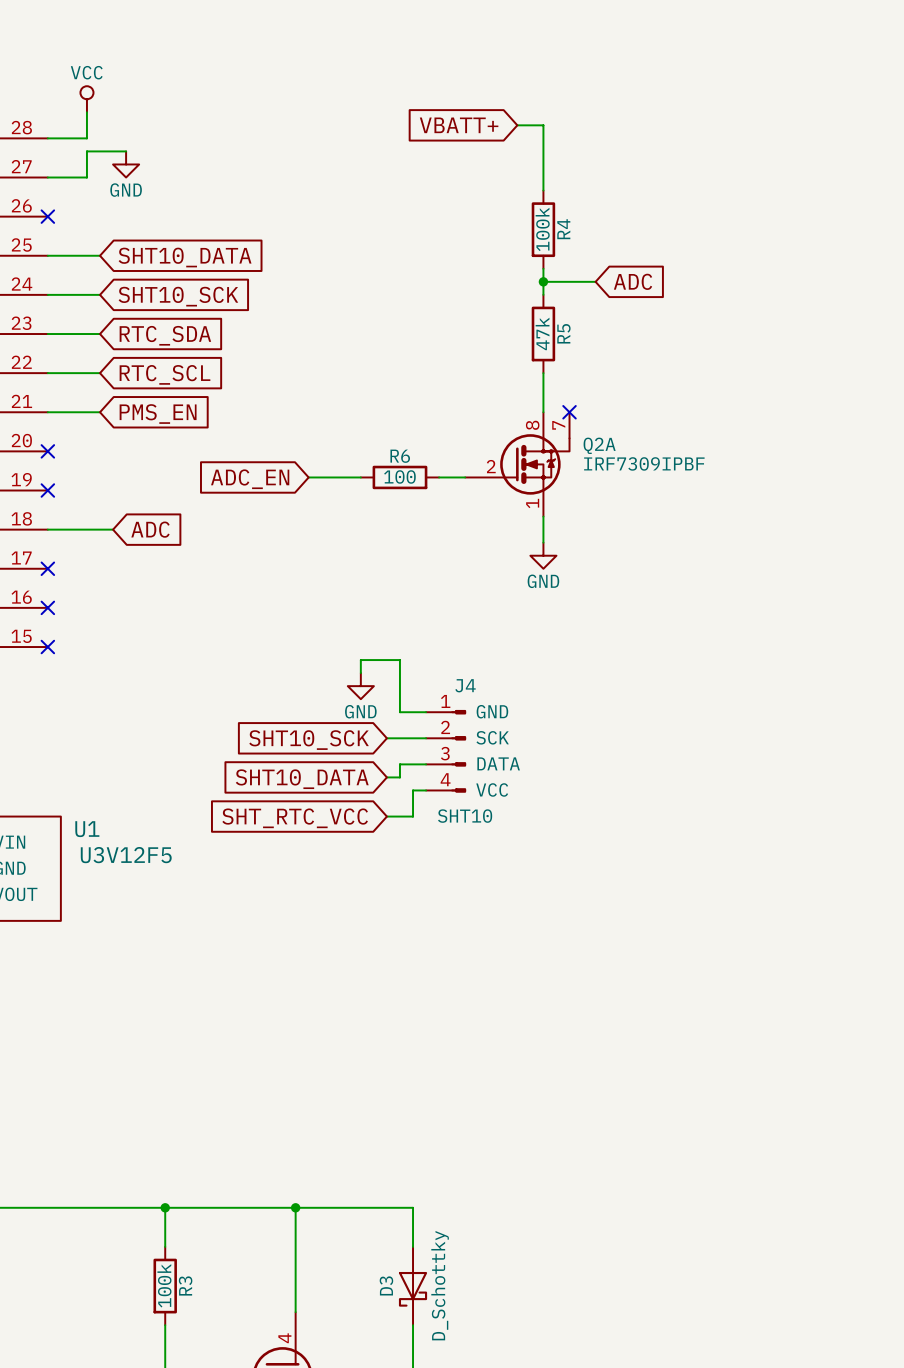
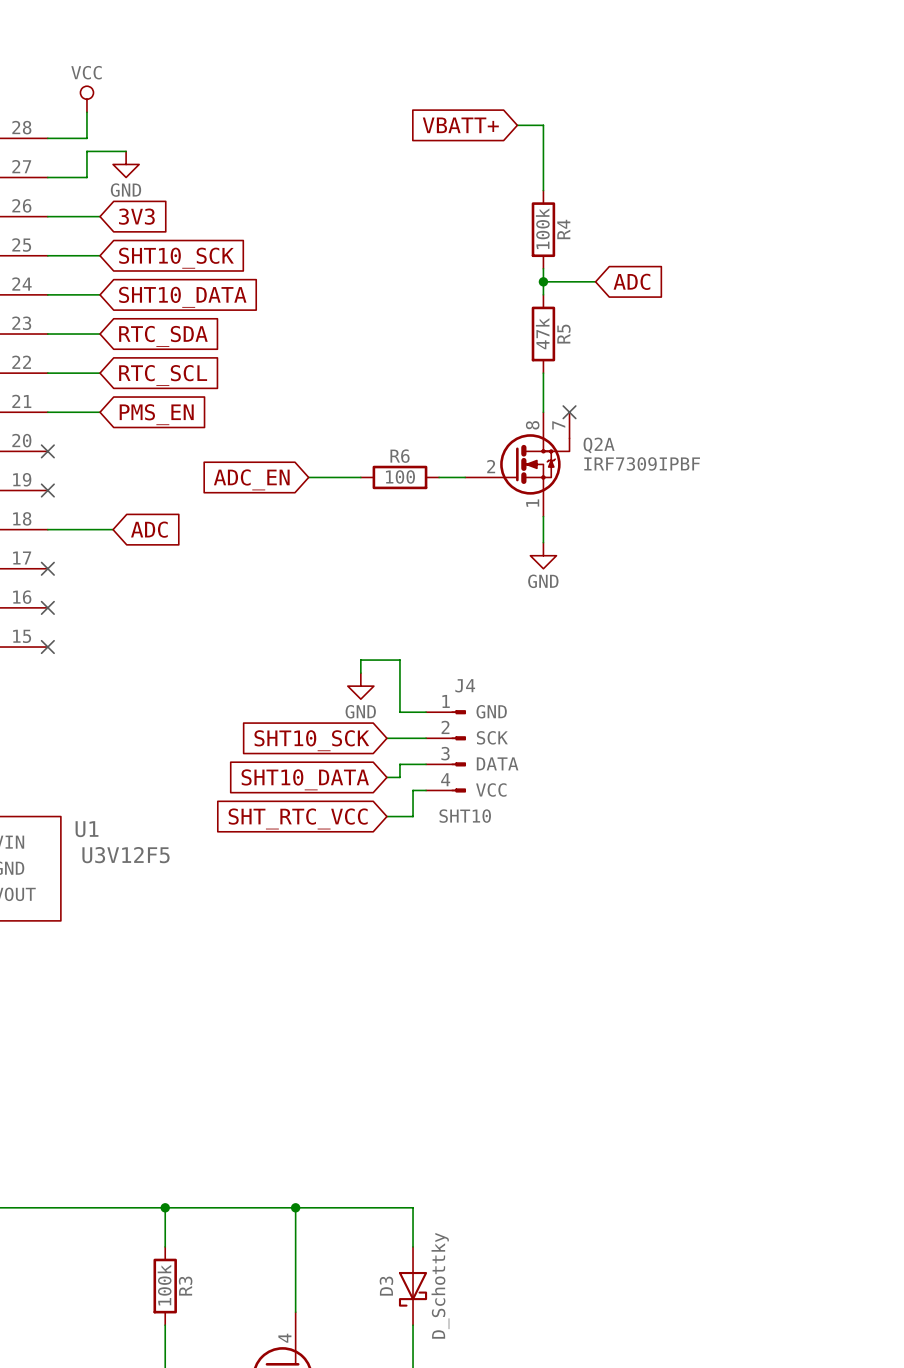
wire: none -> (47, 216) (100, 216)
no-connect mark: (47, 216) -> none
global label: none -> 3V3 (136, 216)
global label: SHT10_DATA (185, 257) -> SHT10_SCK (176, 258)
global label: SHT10_SCK (178, 296) -> SHT10_DATA (182, 297)

